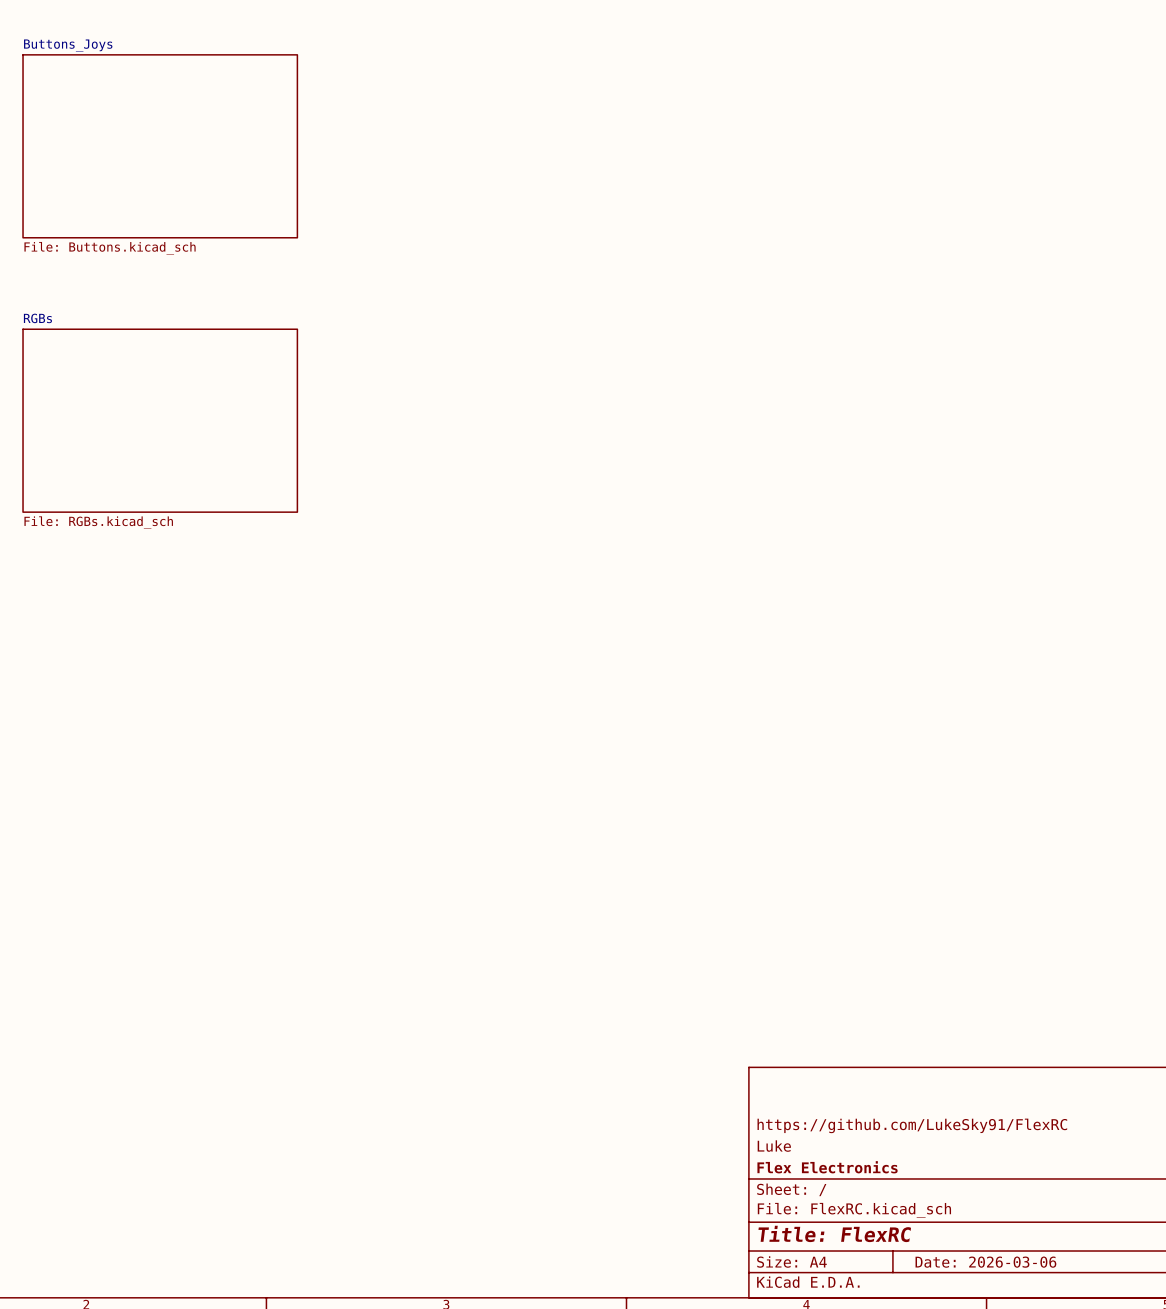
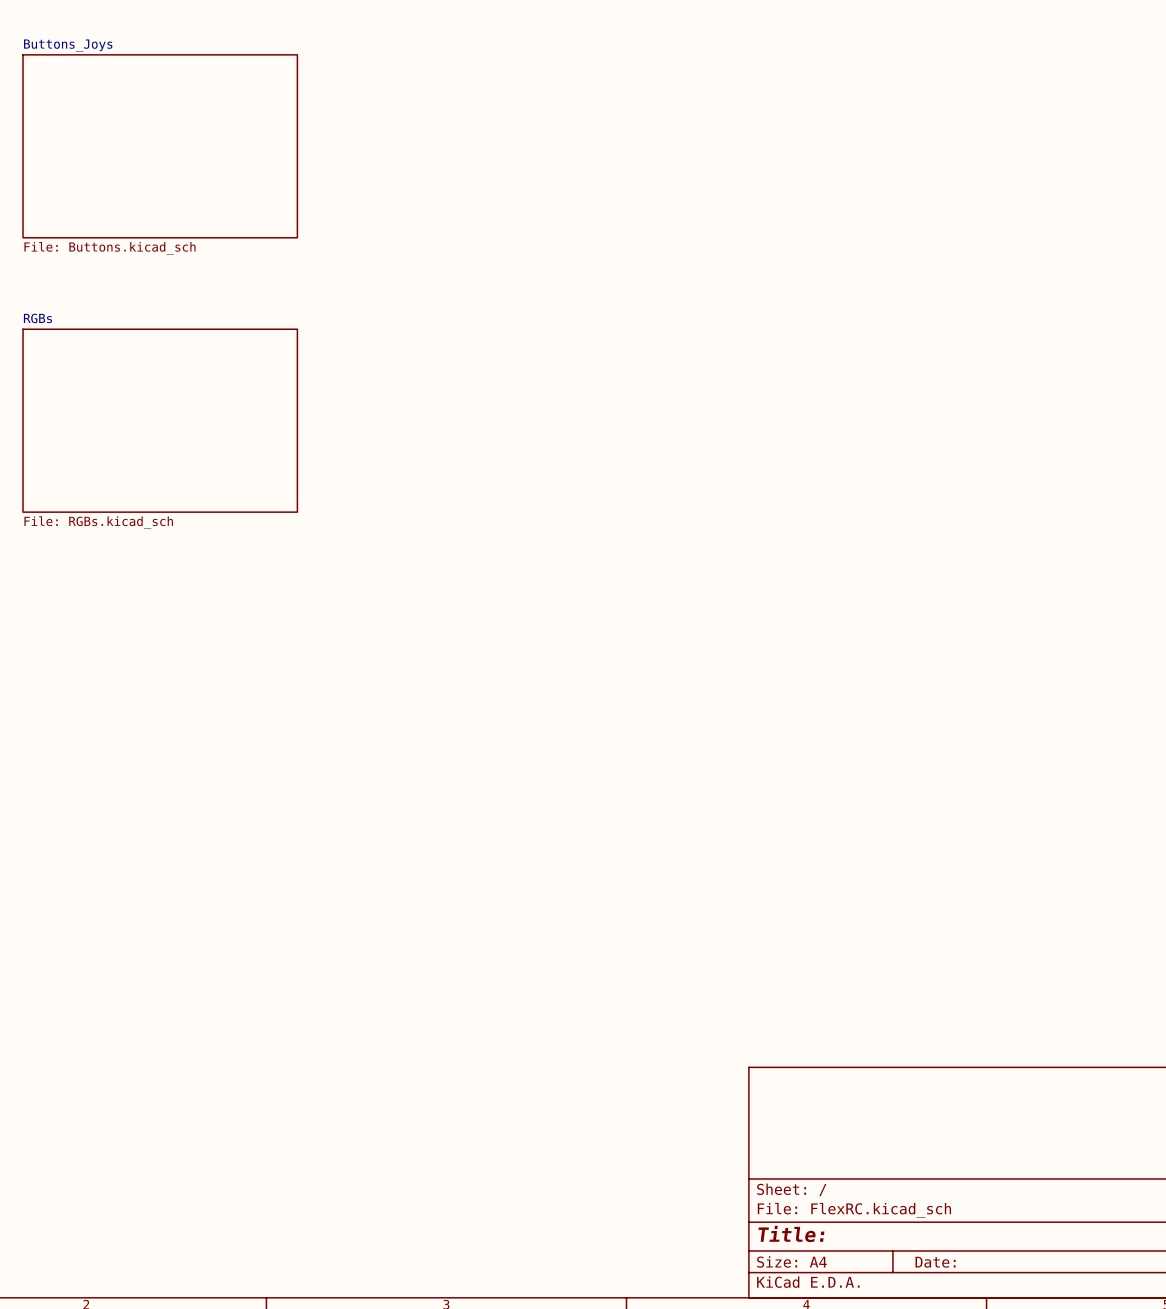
title block: https://github.com/LukeSky91/FlexRC (912, 1125) -> none
title block: Luke (774, 1146) -> none
title block: Flex Electronics (827, 1167) -> none
title block: Title: FlexRC (834, 1233) -> Title: (791, 1233)
title block: Date: 2026-03-06 (985, 1262) -> Date: (935, 1262)

